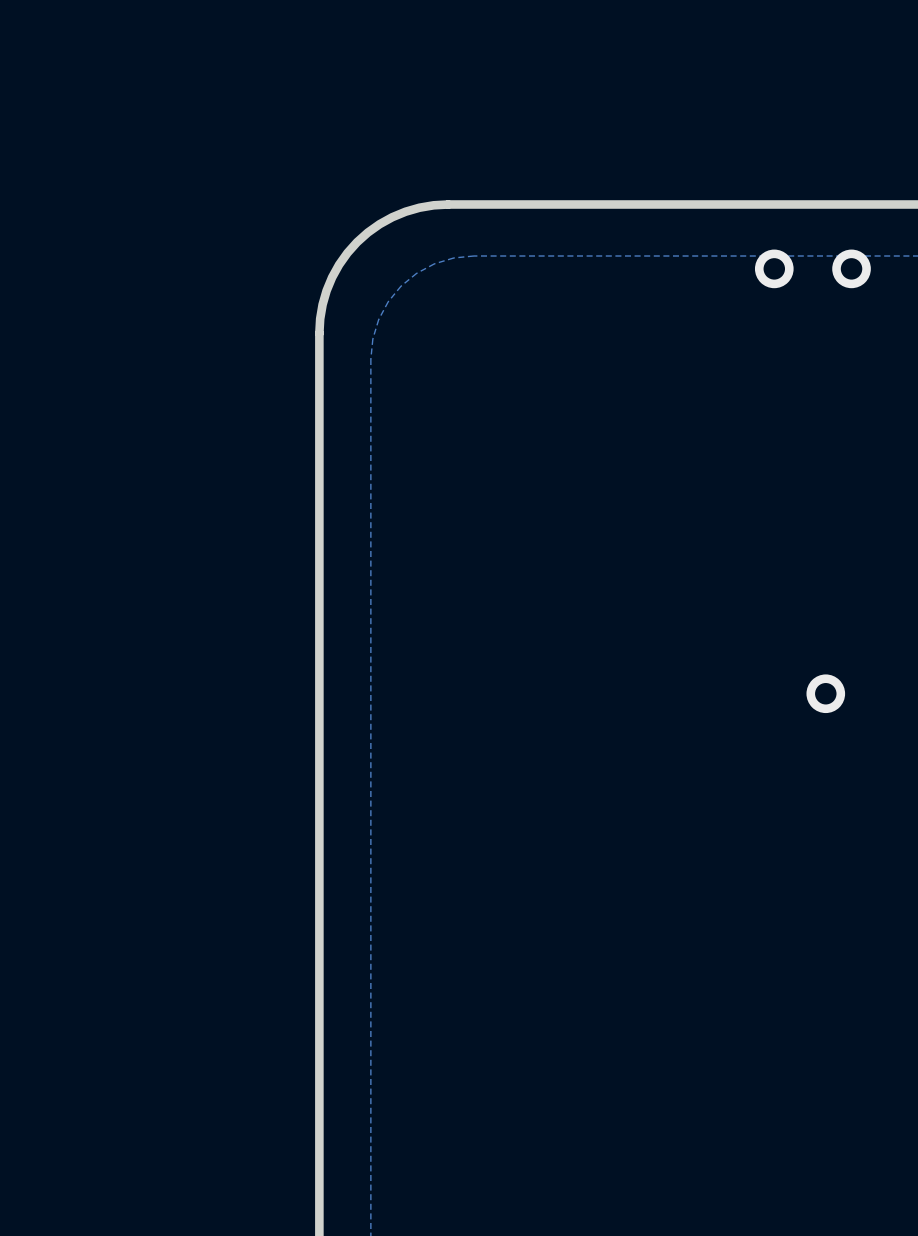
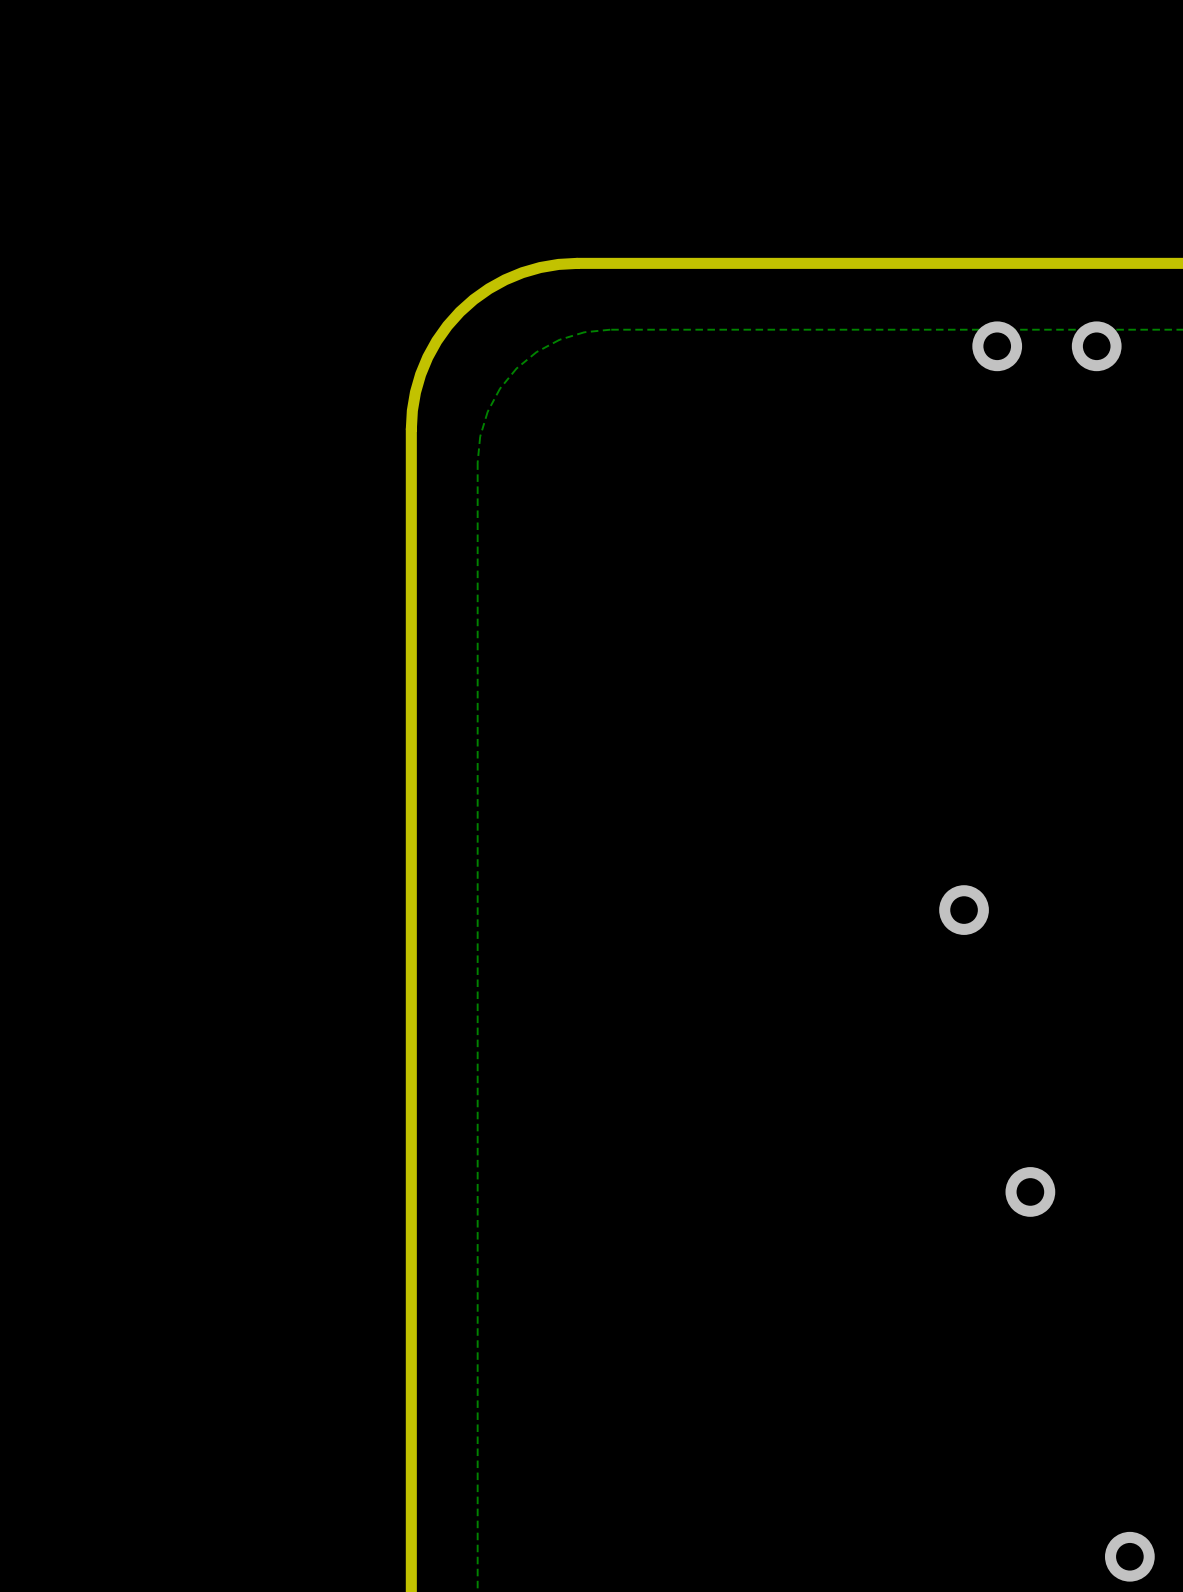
via position: (825, 693) -> (964, 910)
via: none -> (1030, 1191)
via: none -> (1129, 1556)

